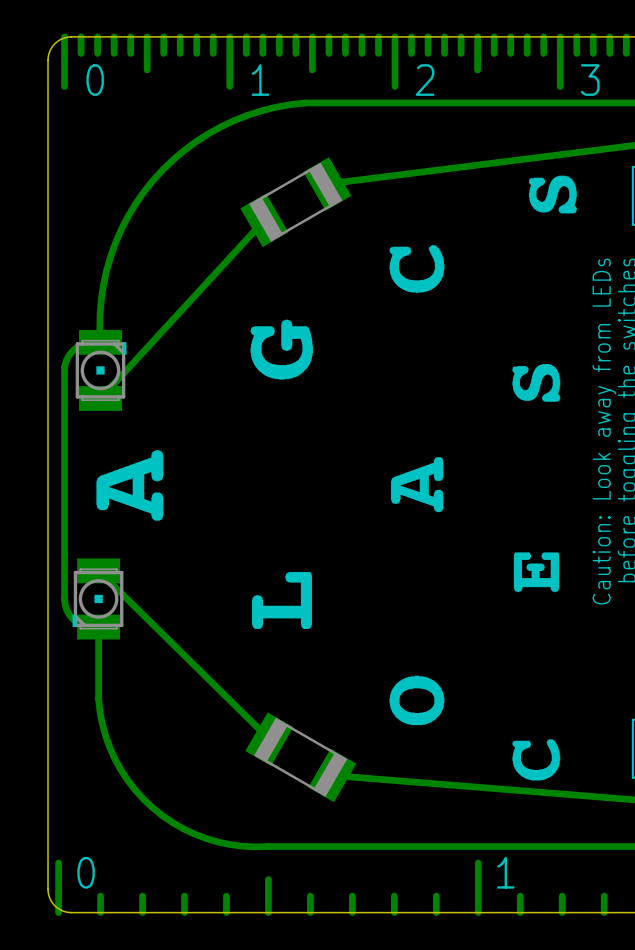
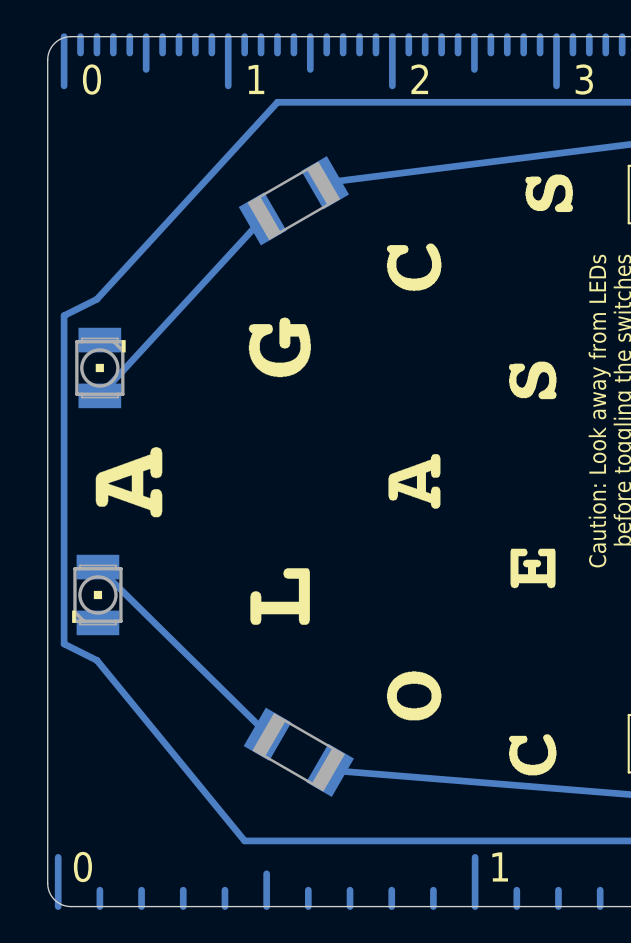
track: (305, 102) (262, 110) (221, 126) (184, 150) (153, 180) (128, 216) (110, 256) (101, 298) (100, 342) -> (303, 102) (277, 102) (96, 299) (64, 315) (64, 364)
track: (97, 342) (86, 343) (75, 348) (68, 356) (64, 367) -> none
track: (64, 598) (66, 609) (74, 620) (84, 626) (98, 627) (98, 698) (102, 723) (114, 758) (135, 789) (162, 815) (194, 834) (230, 844) (267, 846) -> (64, 594) (64, 643) (96, 660) (244, 840) (265, 840)

